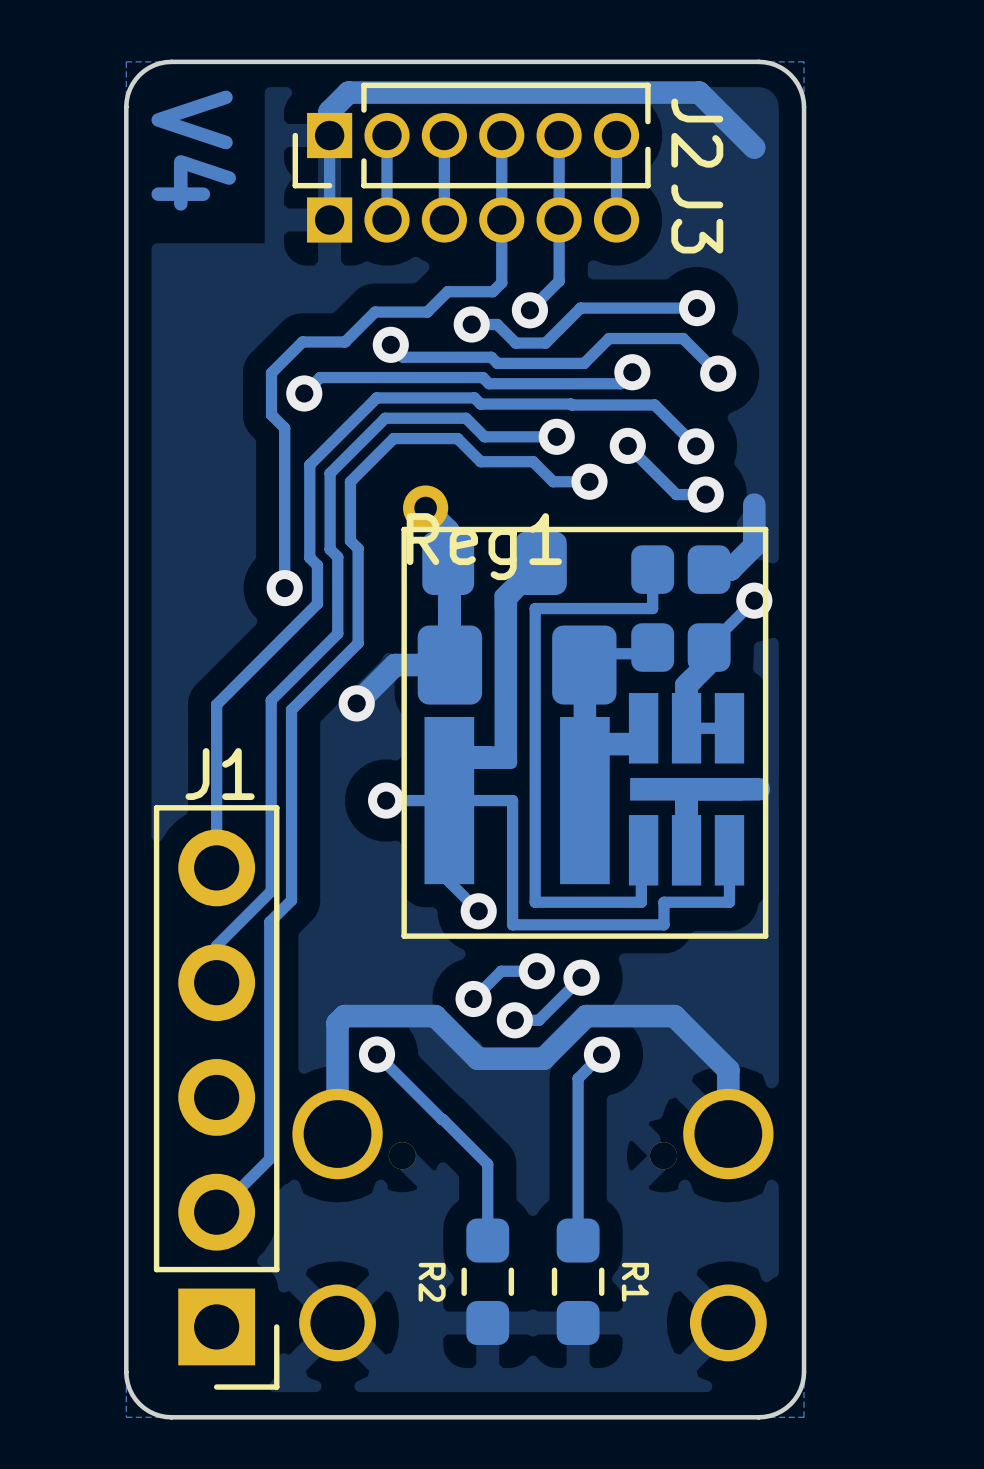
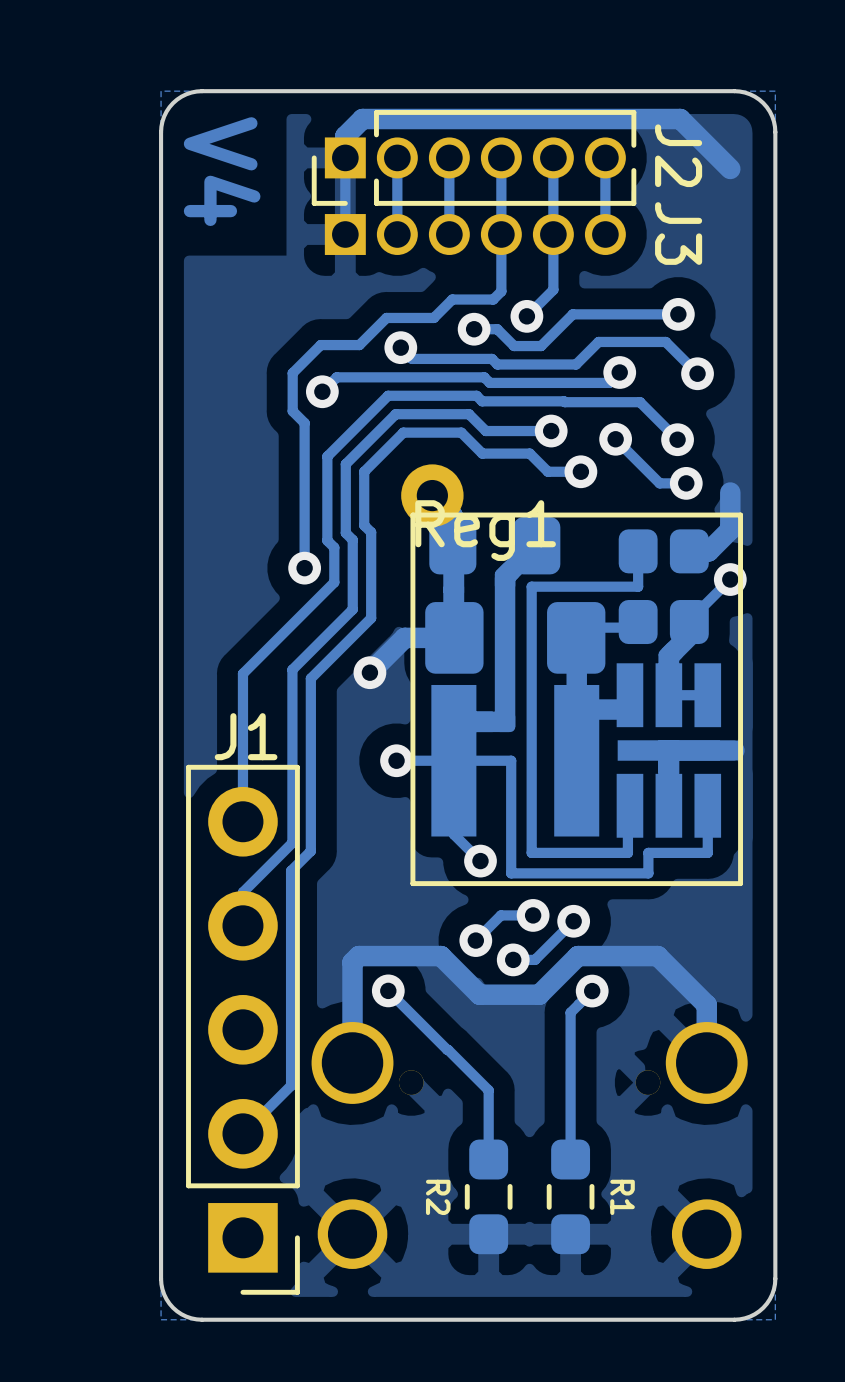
part footprint: [403, 485, 449, 531] -> [401, 464, 464, 527]

